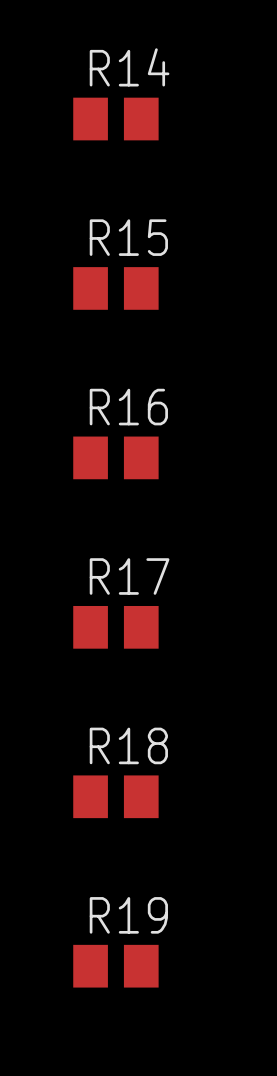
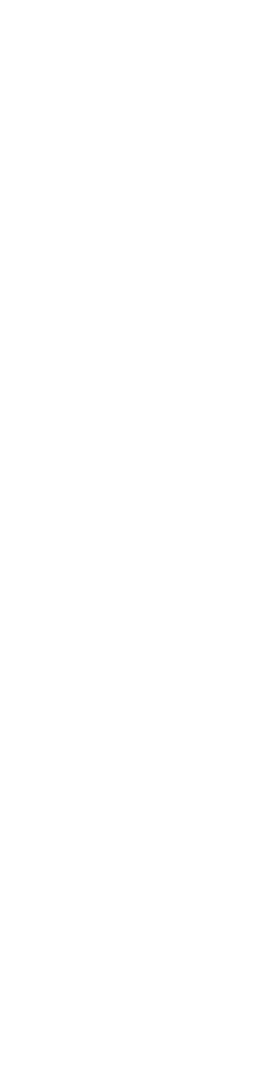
R14: (115, 119) -> none
R15: (115, 288) -> none
R16: (115, 457) -> none
R17: (115, 627) -> none
R18: (115, 796) -> none
R19: (115, 966) -> none

